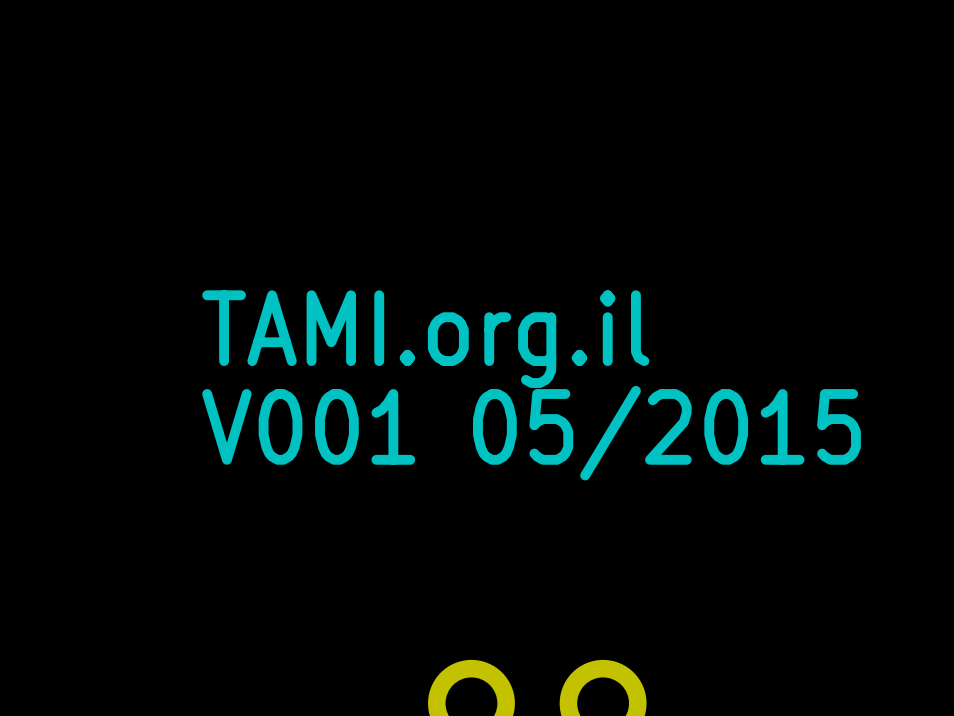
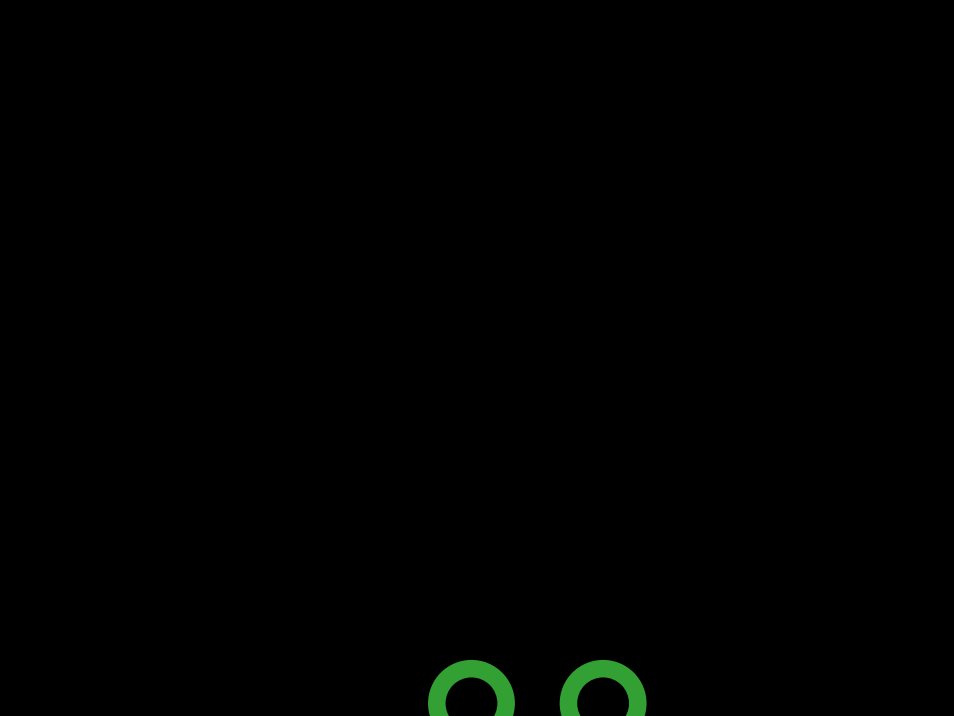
text: TAMI.org.il (425, 339) -> none
text: V001 05/2015 (531, 433) -> none

